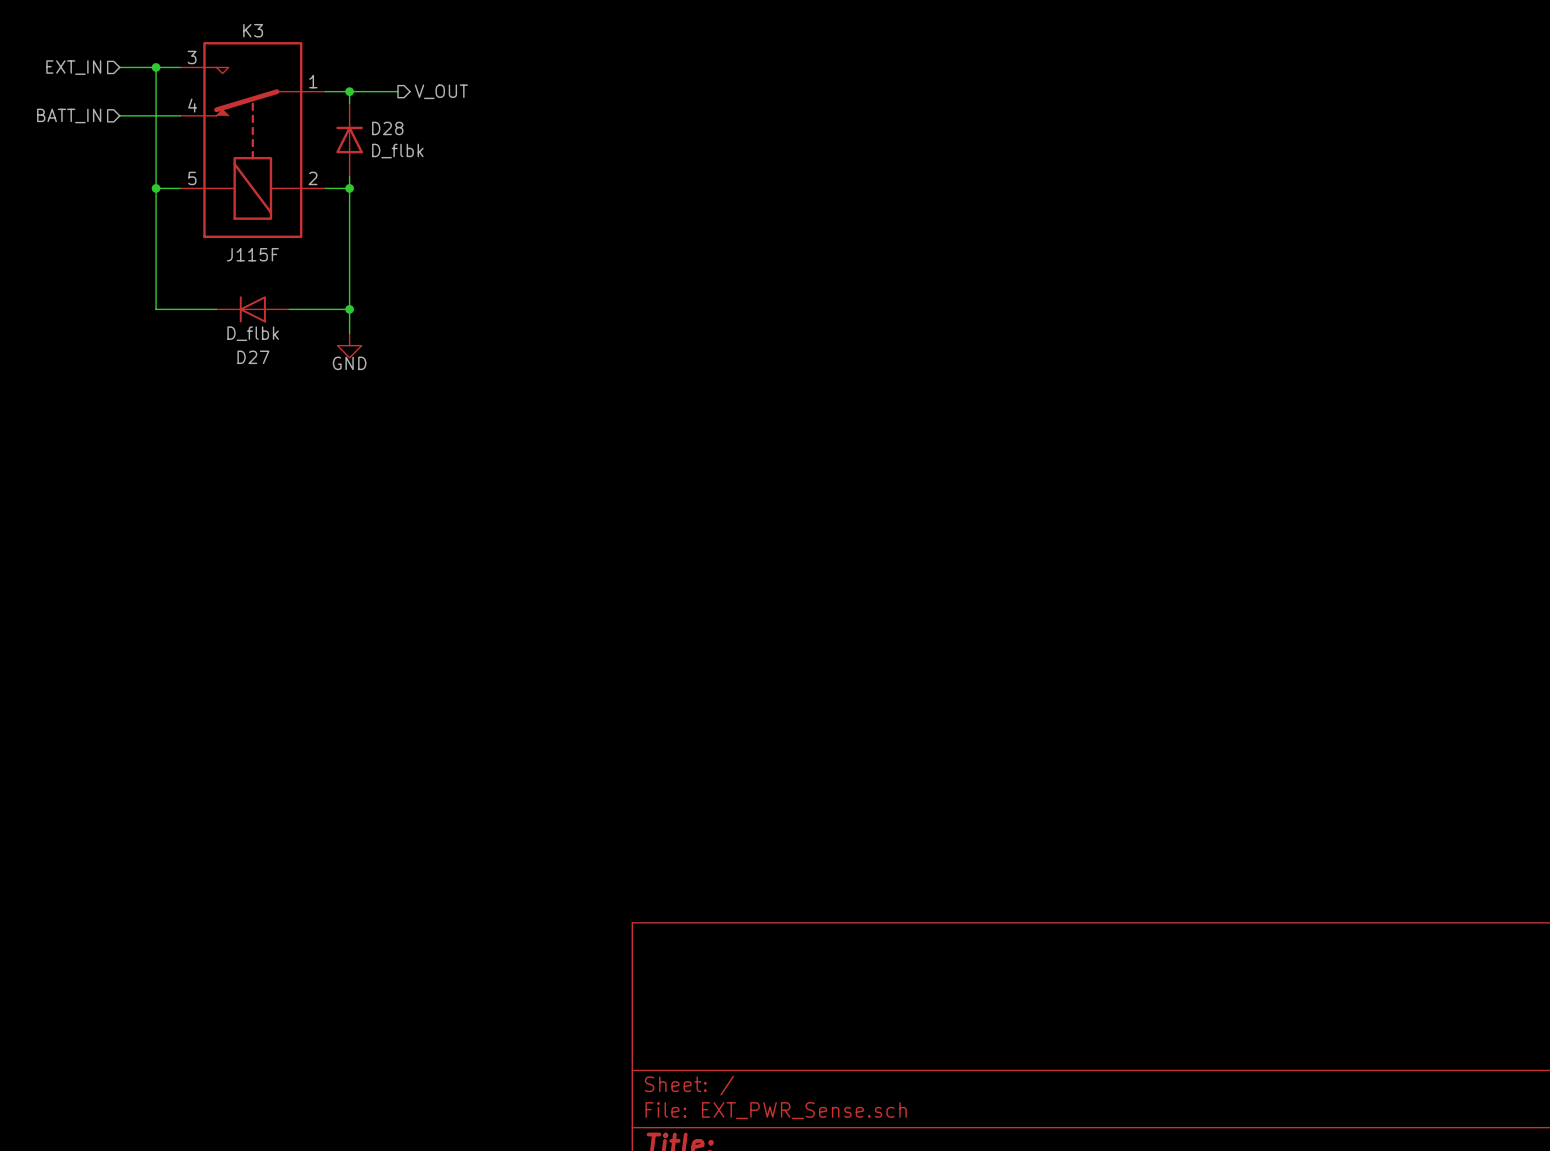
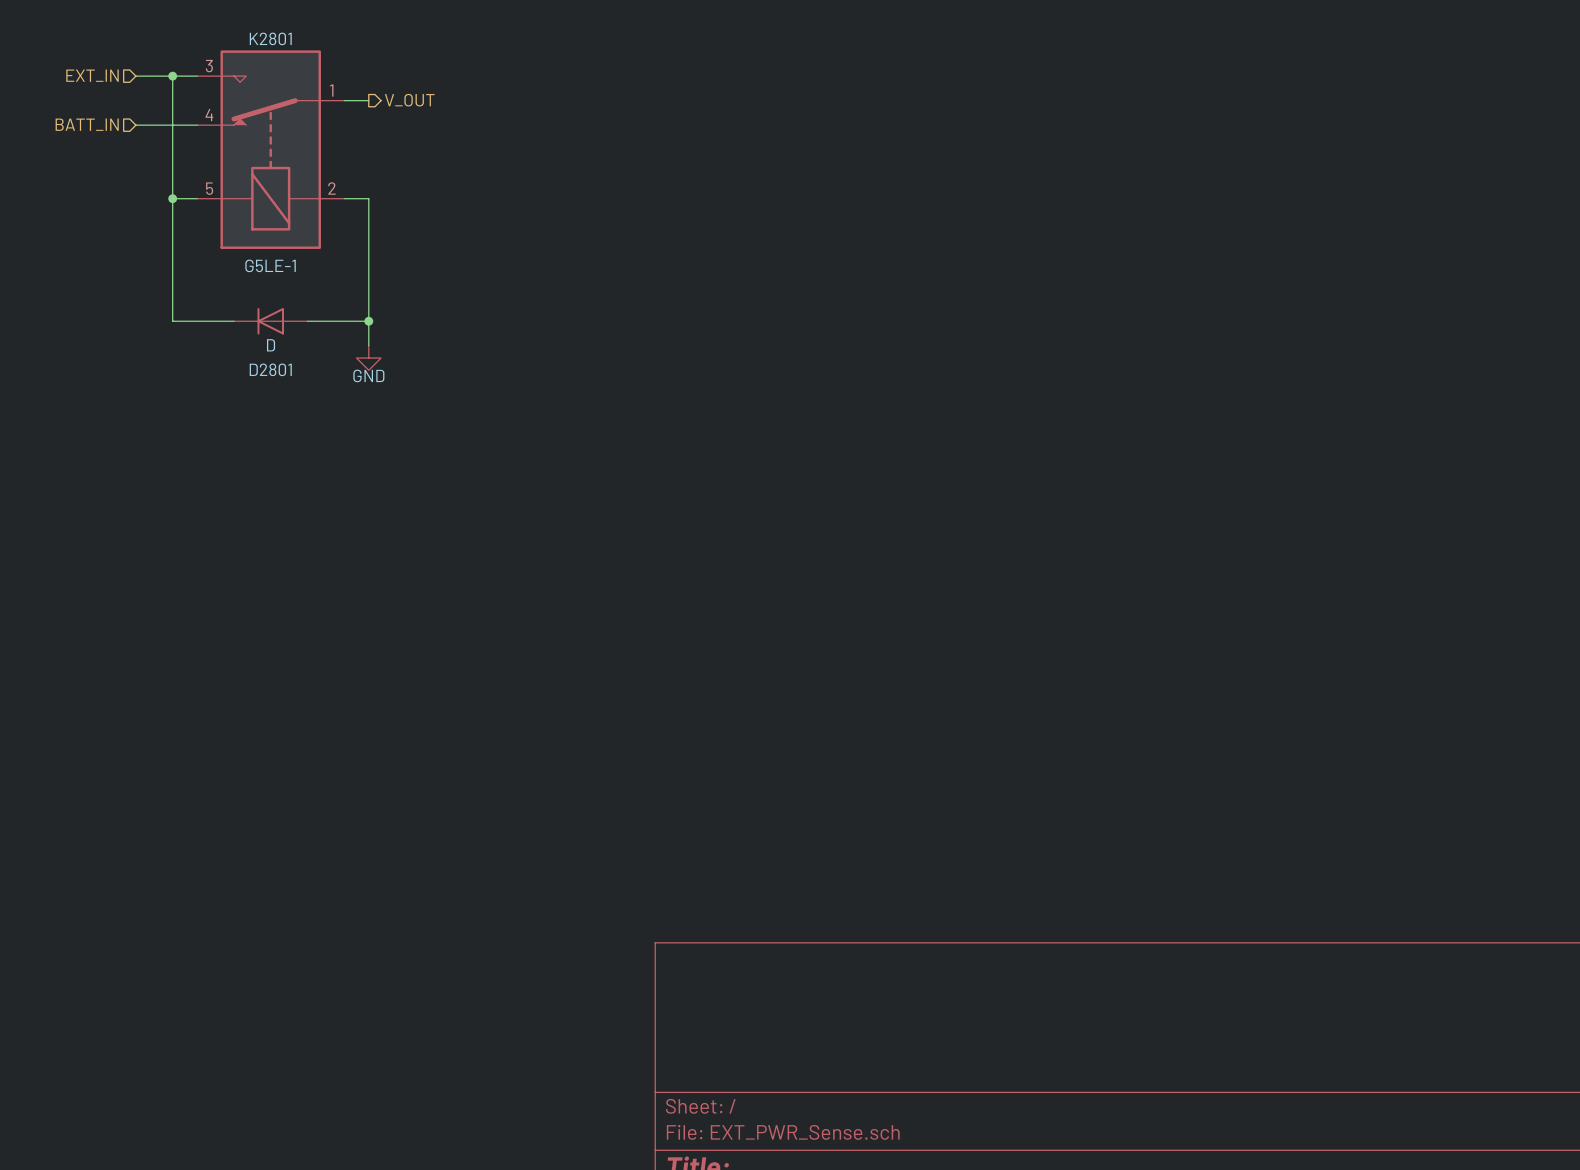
K3 name: K3 (253, 30) -> K2801 (270, 38)
junction: (349, 91) -> none
wire: (397, 91) (349, 91) (349, 103) -> none
hierarchical label position: V_OUT (441, 91) -> V_OUT (409, 100)
D28: D_flbk (349, 140) -> none
wire: (349, 176) (349, 188) -> none
junction: (349, 188) -> none
K3 value: J115F (252, 254) -> G5LE-1 (270, 265)
D27 value: D_flbk (253, 333) -> D (271, 345)
D27 name: D27 (253, 357) -> D2801 (270, 369)

